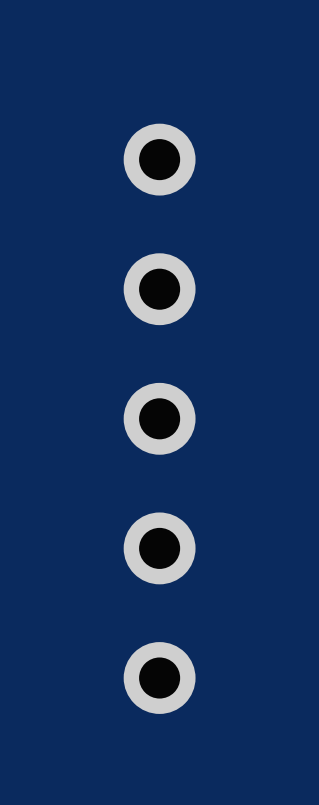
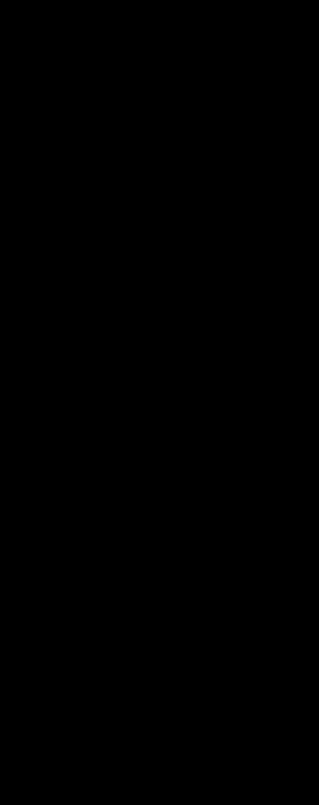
part: (159, 159) -> none
part: (159, 289) -> none
part: (159, 418) -> none
part: (159, 548) -> none
part: (159, 678) -> none

